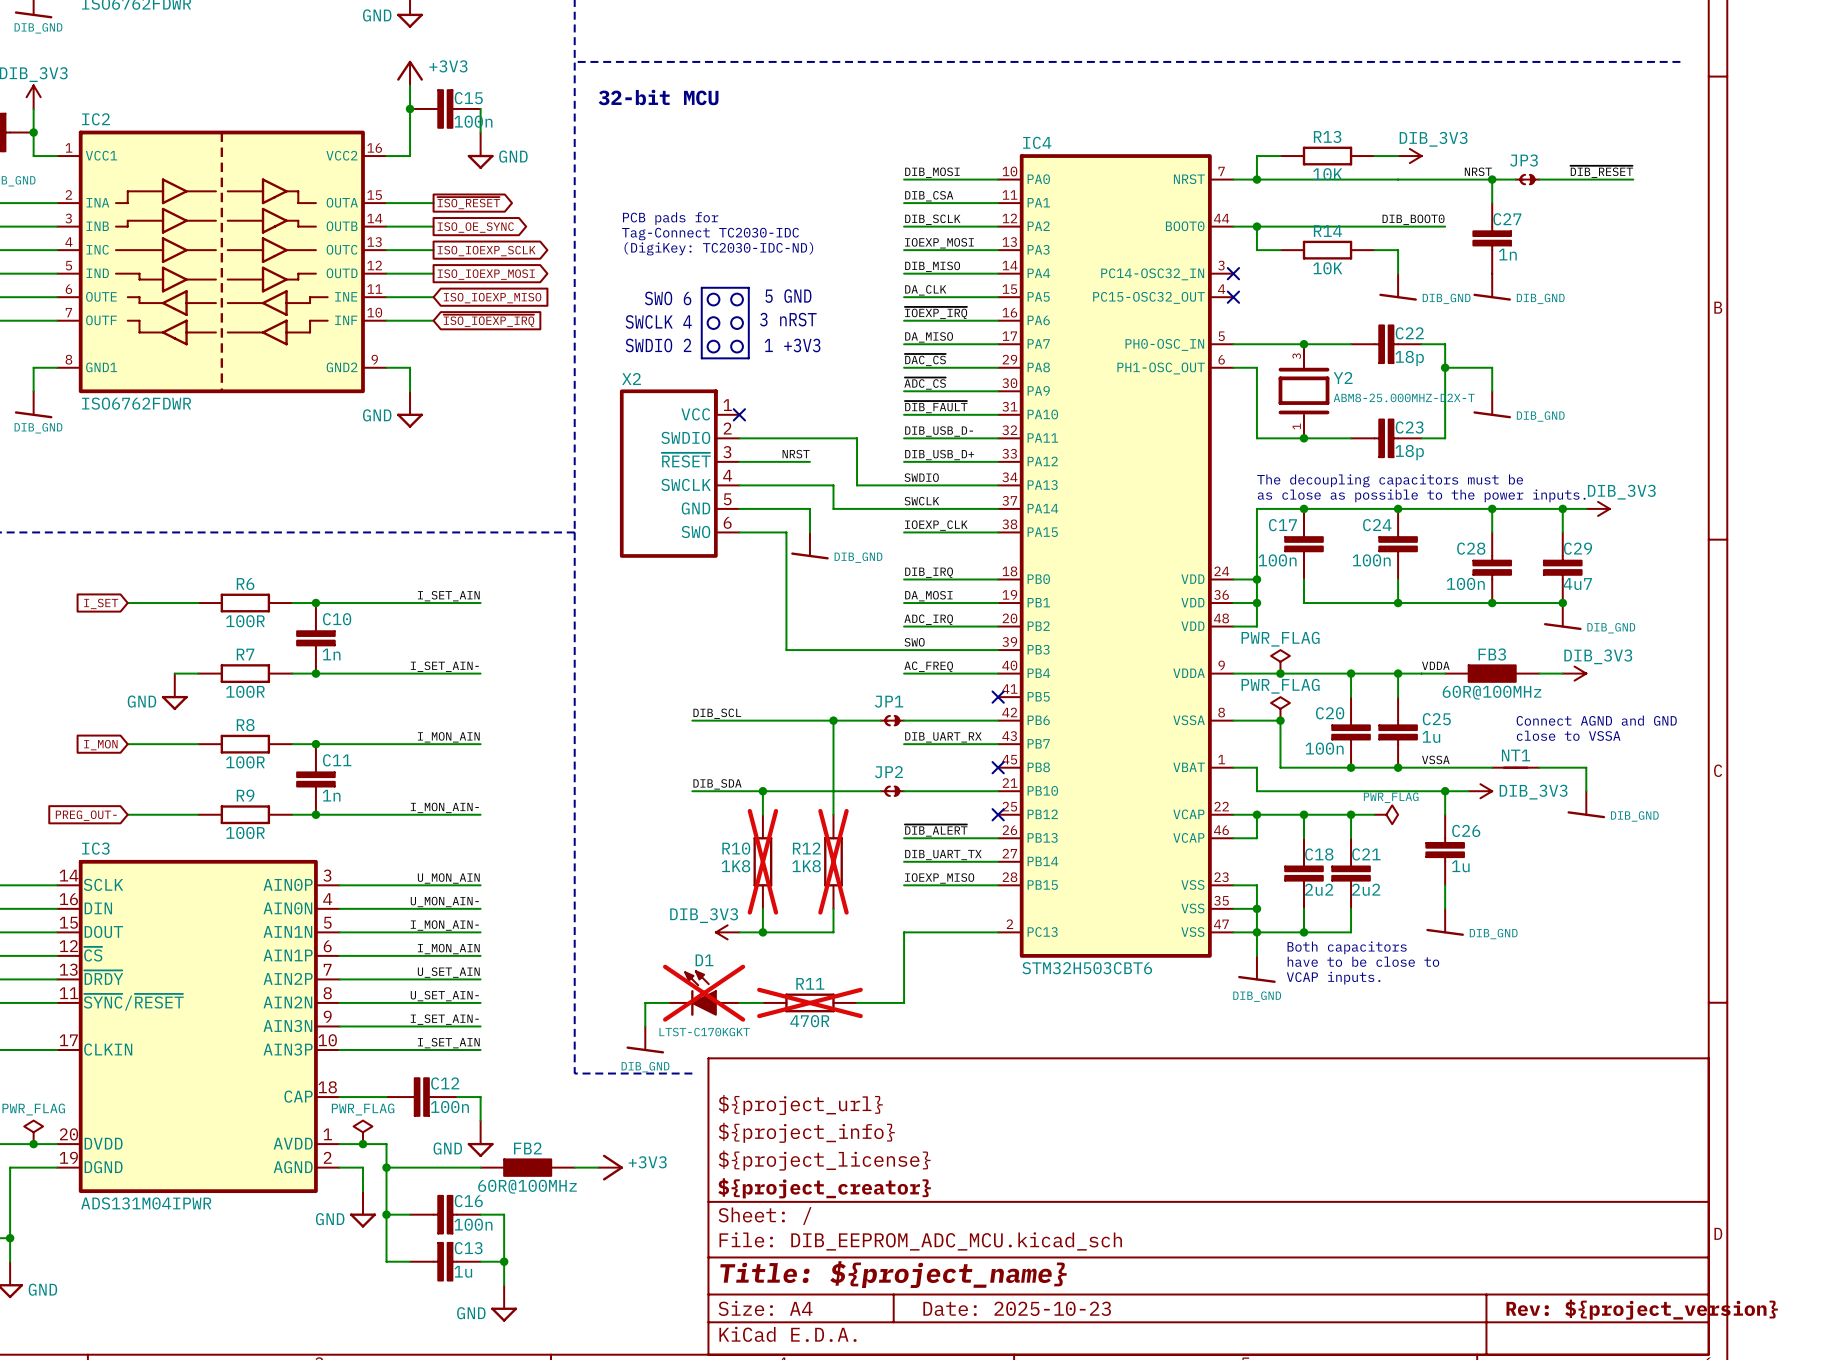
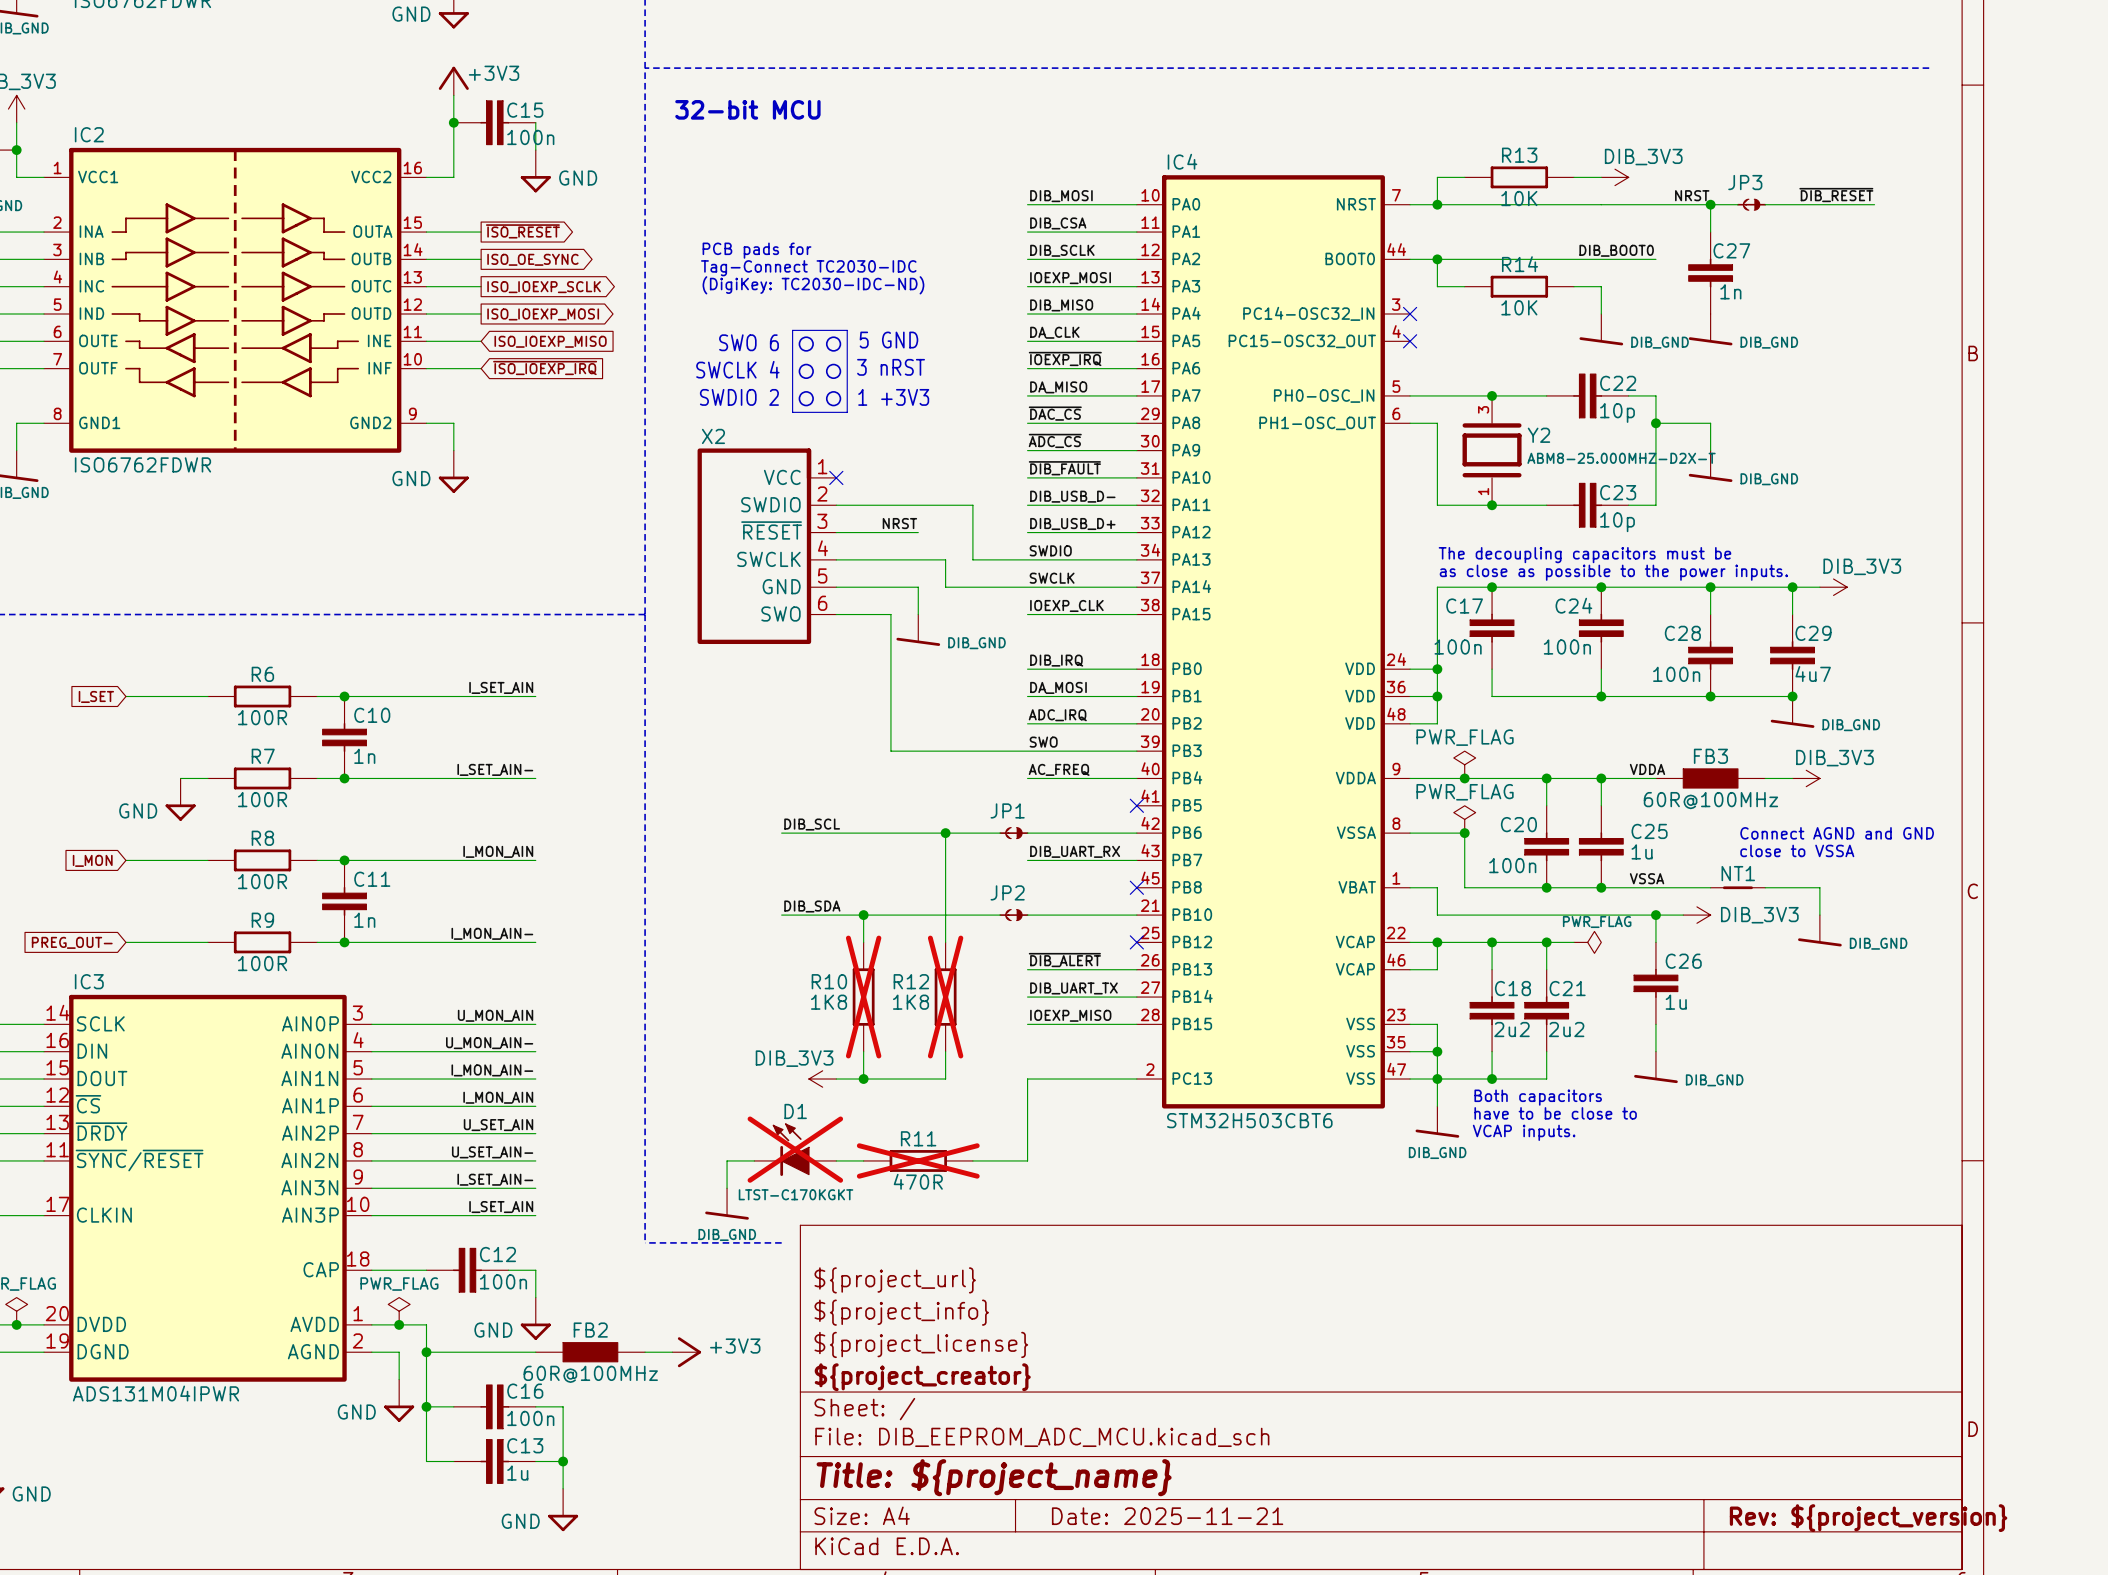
C22 value: 18p (1409, 358) -> 10p (1617, 412)
C23 value: 18p (1409, 452) -> 10p (1617, 522)
title block: Date: 2025-10-23 (1017, 1308) -> Date: 2025-11-21 (1167, 1516)

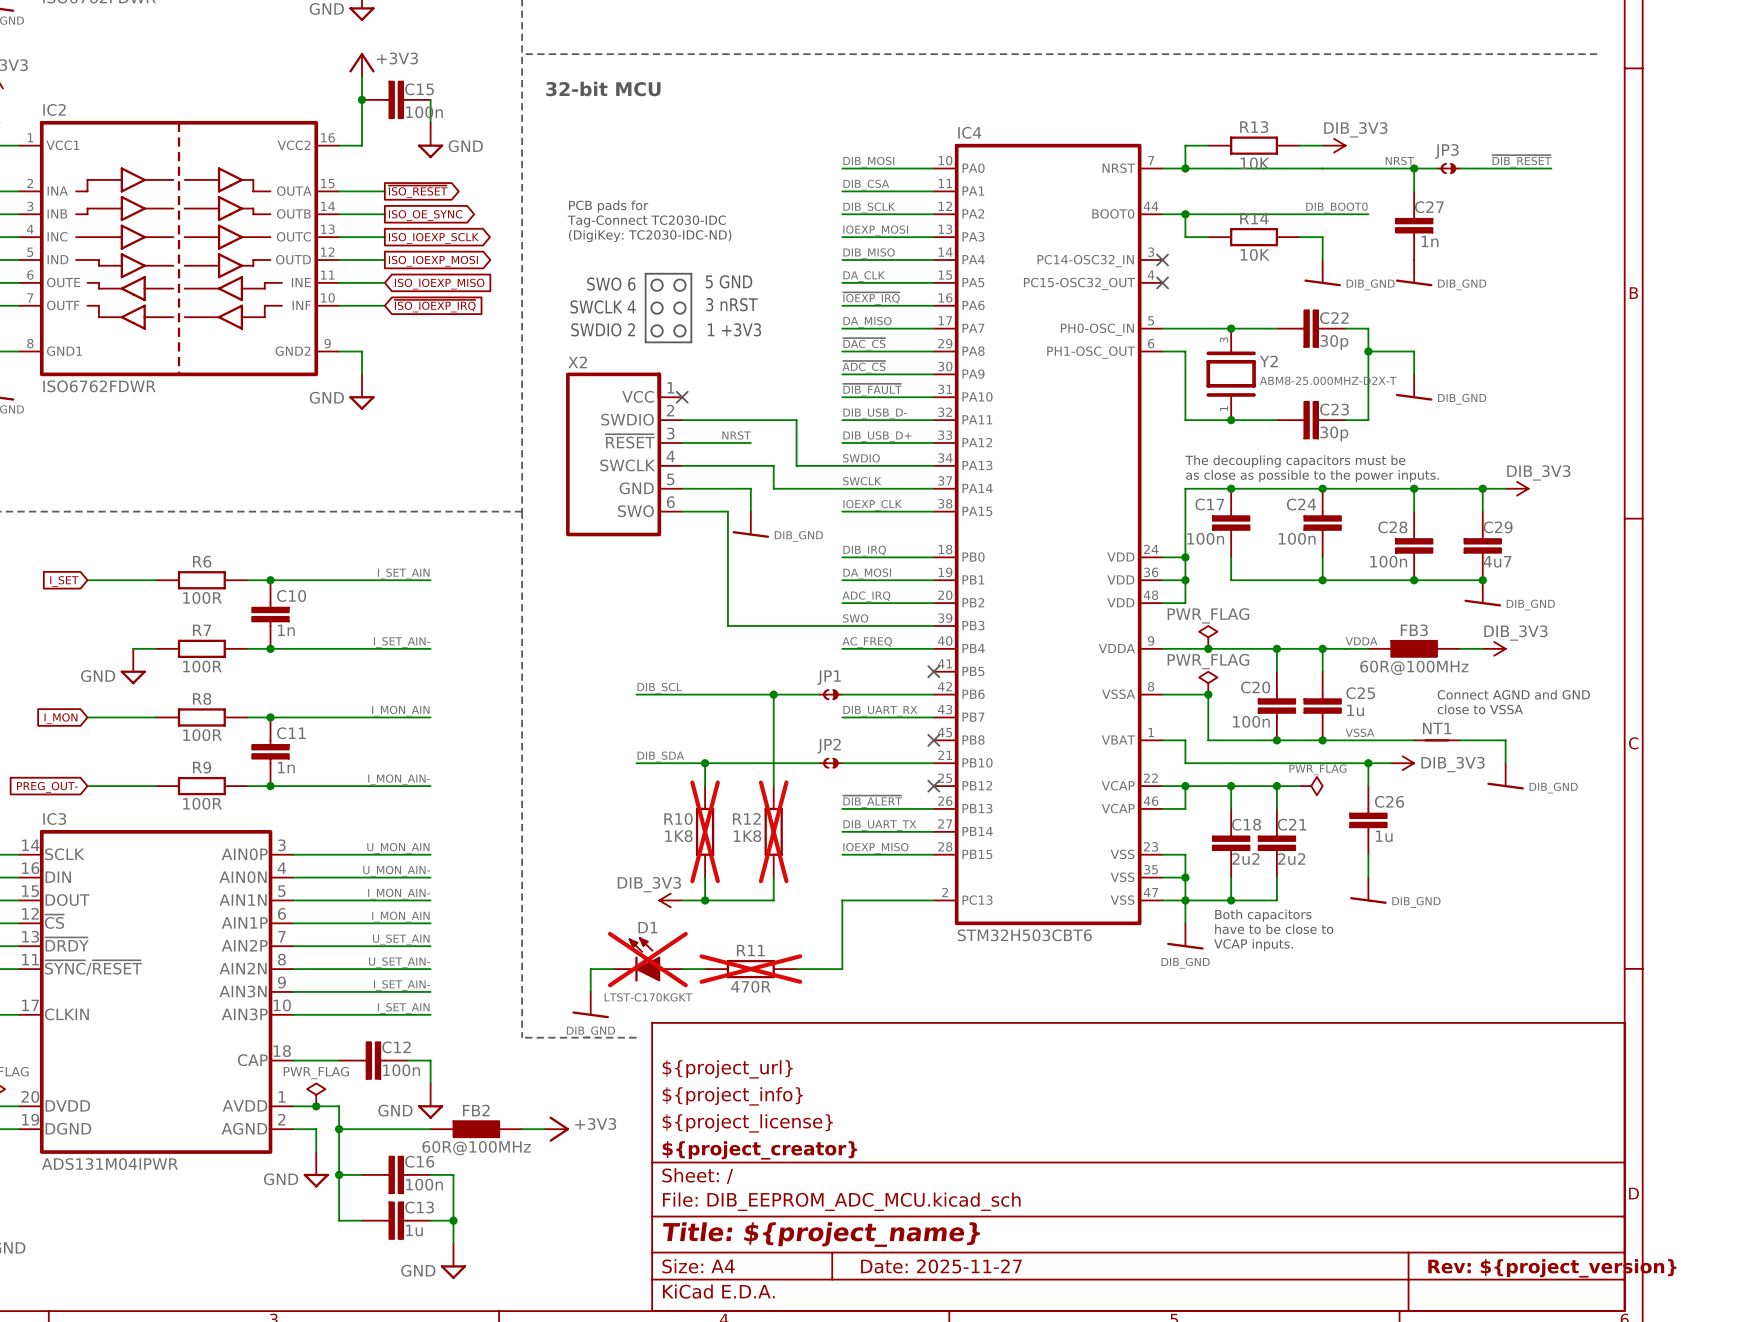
C22 value: 10p (1617, 412) -> 30p (1334, 342)
C23 value: 10p (1617, 522) -> 30p (1334, 433)
title block: Date: 2025-11-21 (1167, 1516) -> Date: 2025-11-27 (941, 1266)

